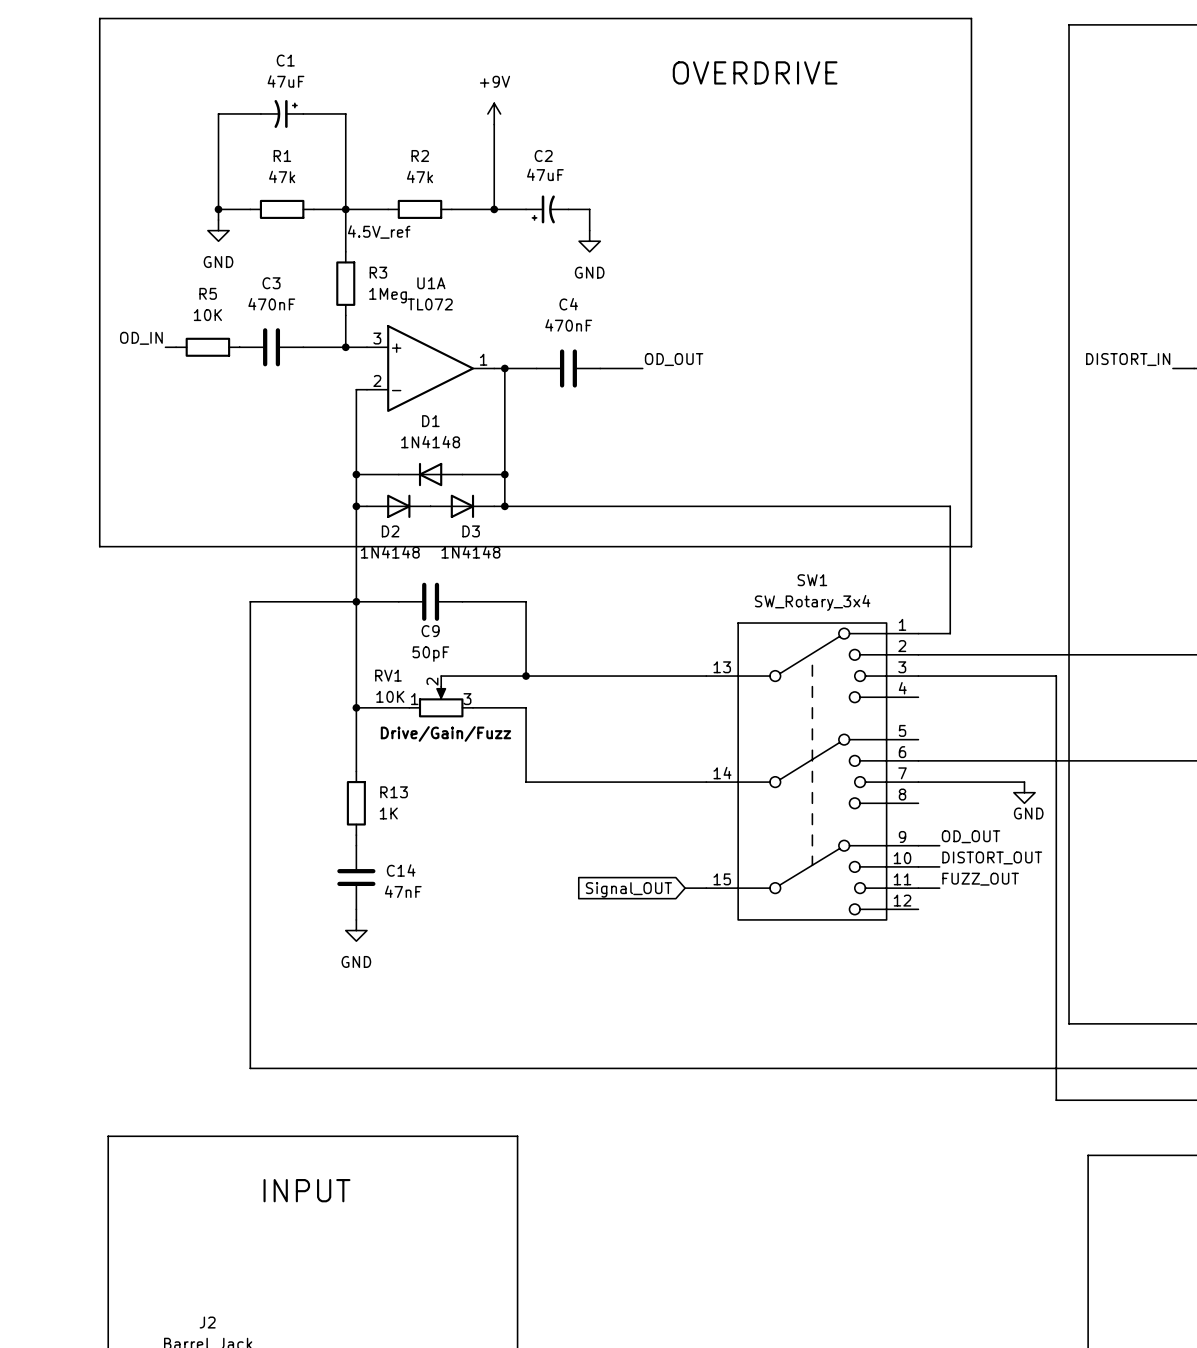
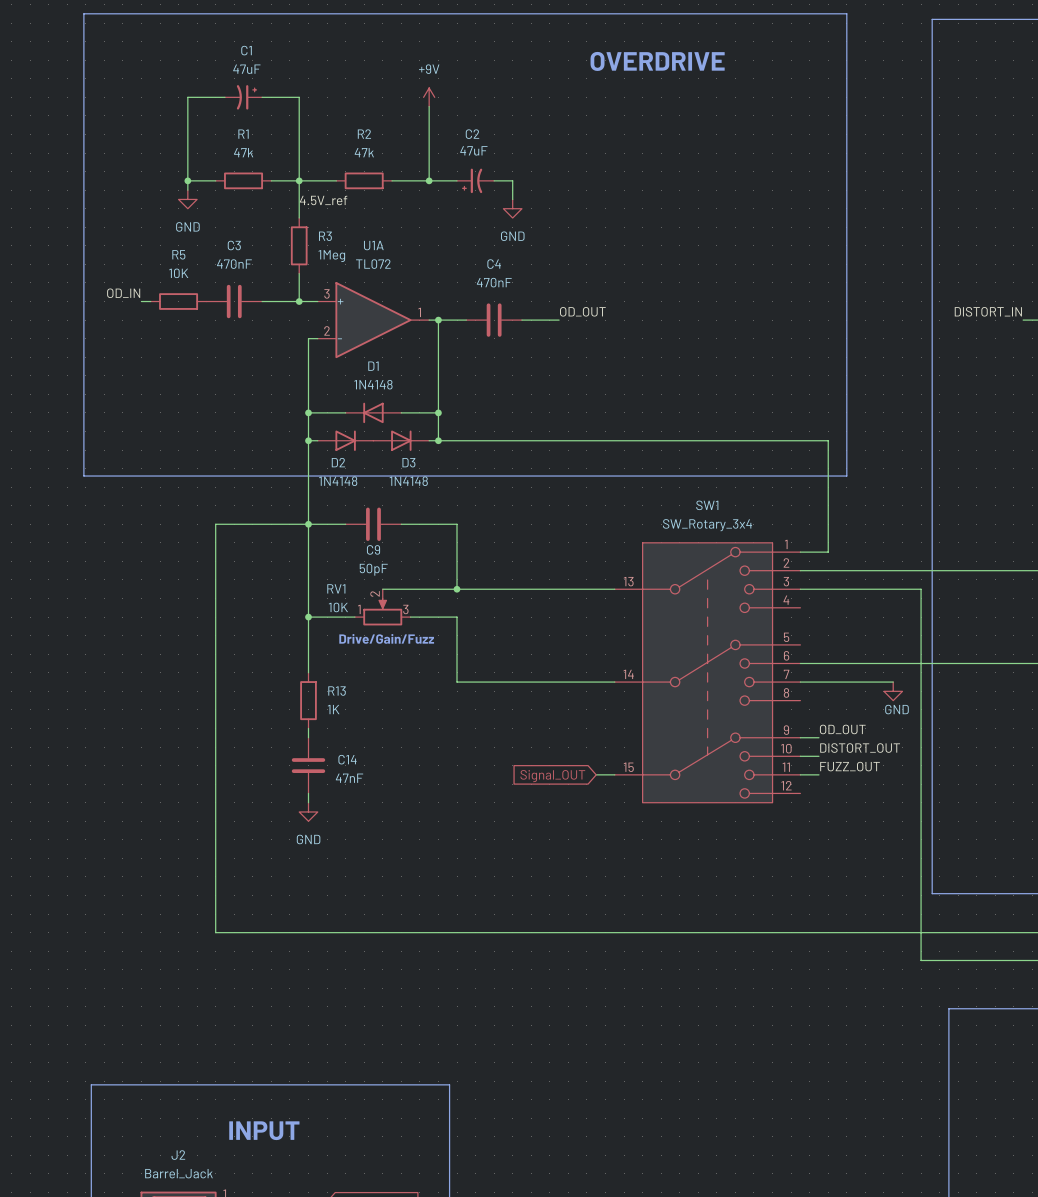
text position: INPUT (306, 1190) -> INPUT (264, 1130)
line: (108, 1242) (108, 1136) (517, 1136) (517, 1242) -> (91, 1084) (449, 1084)

